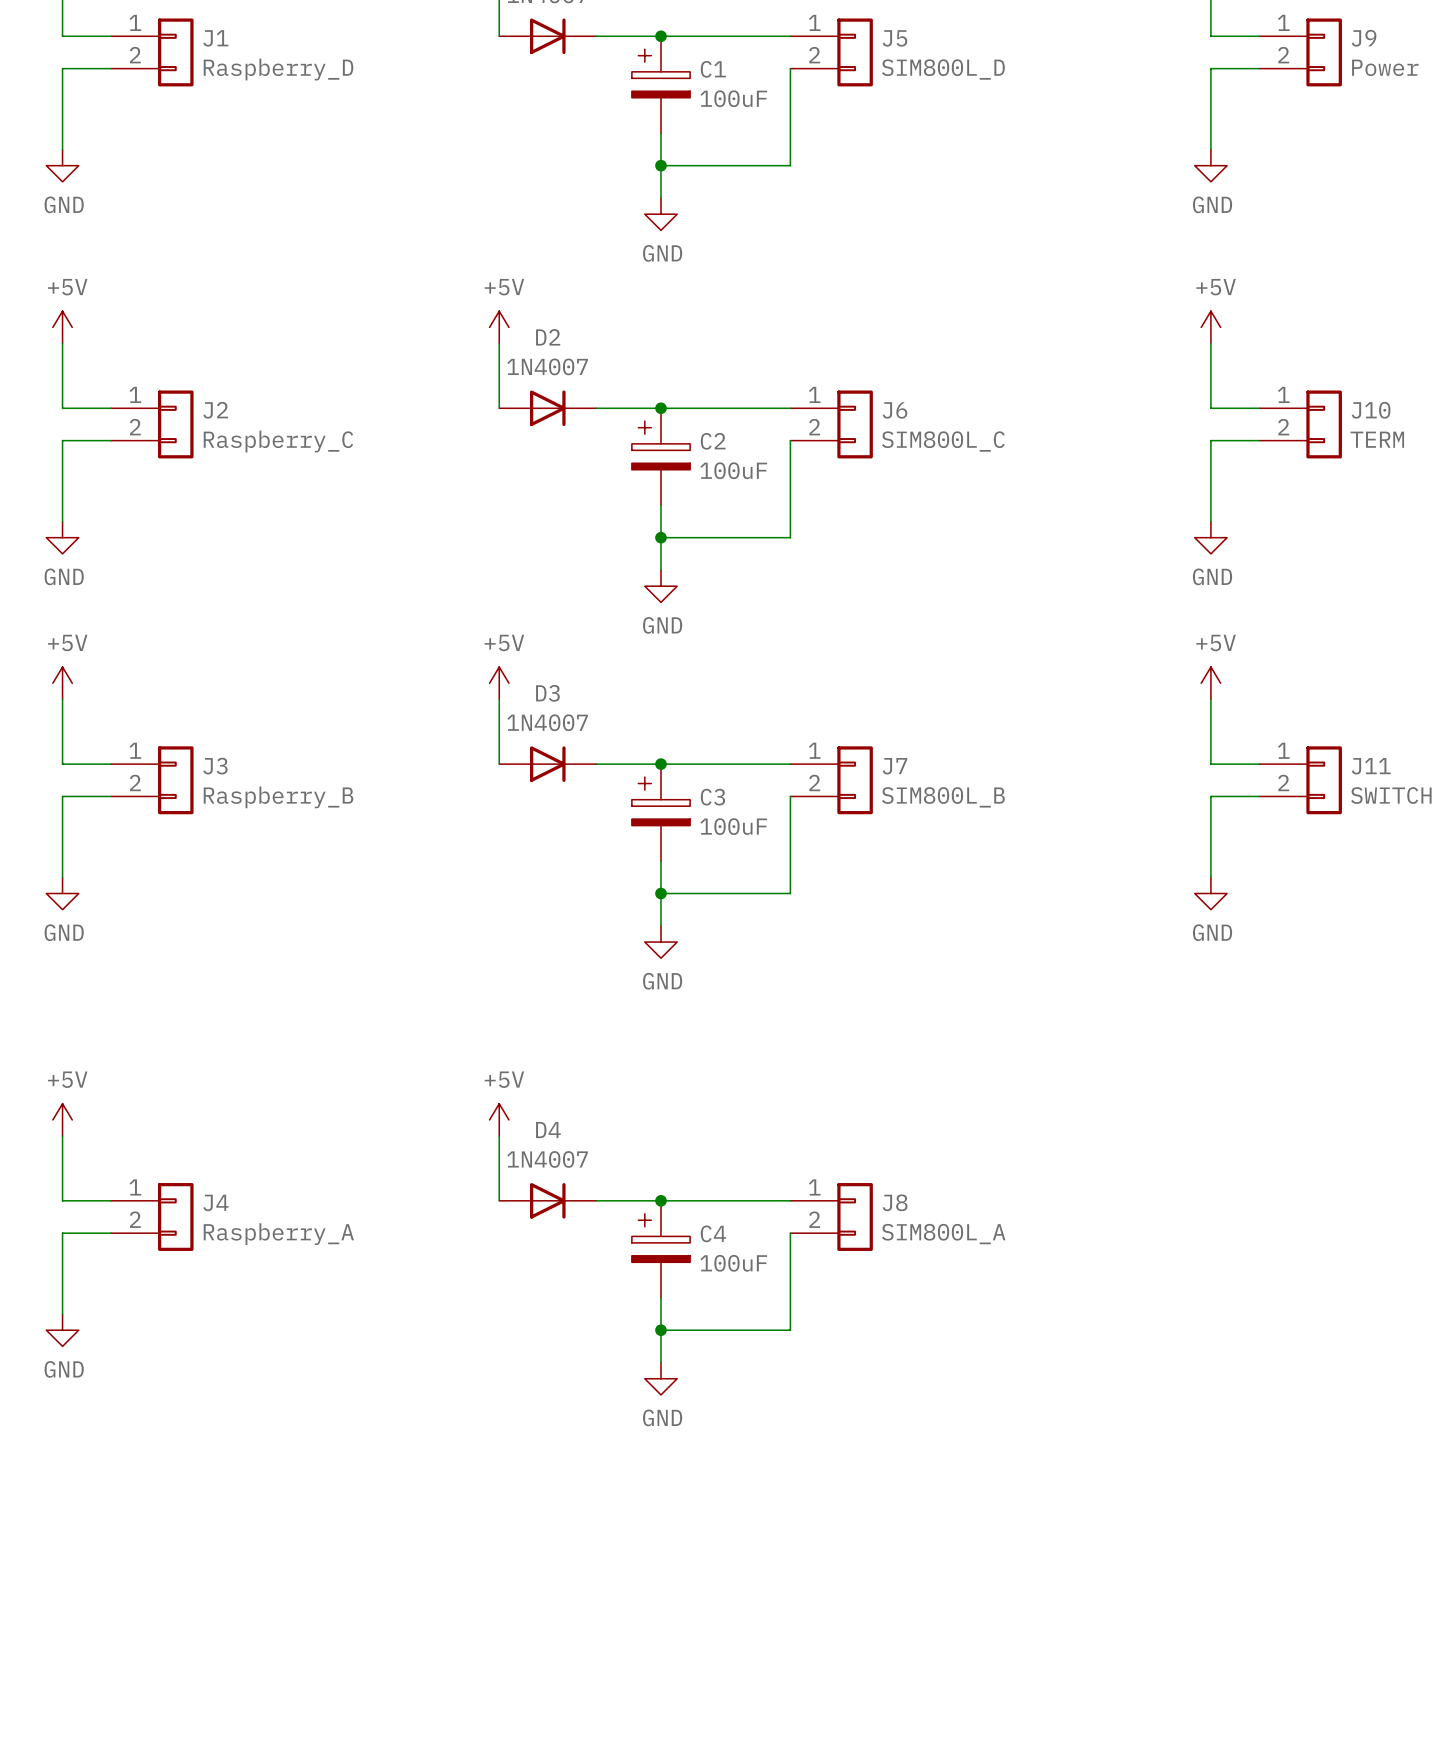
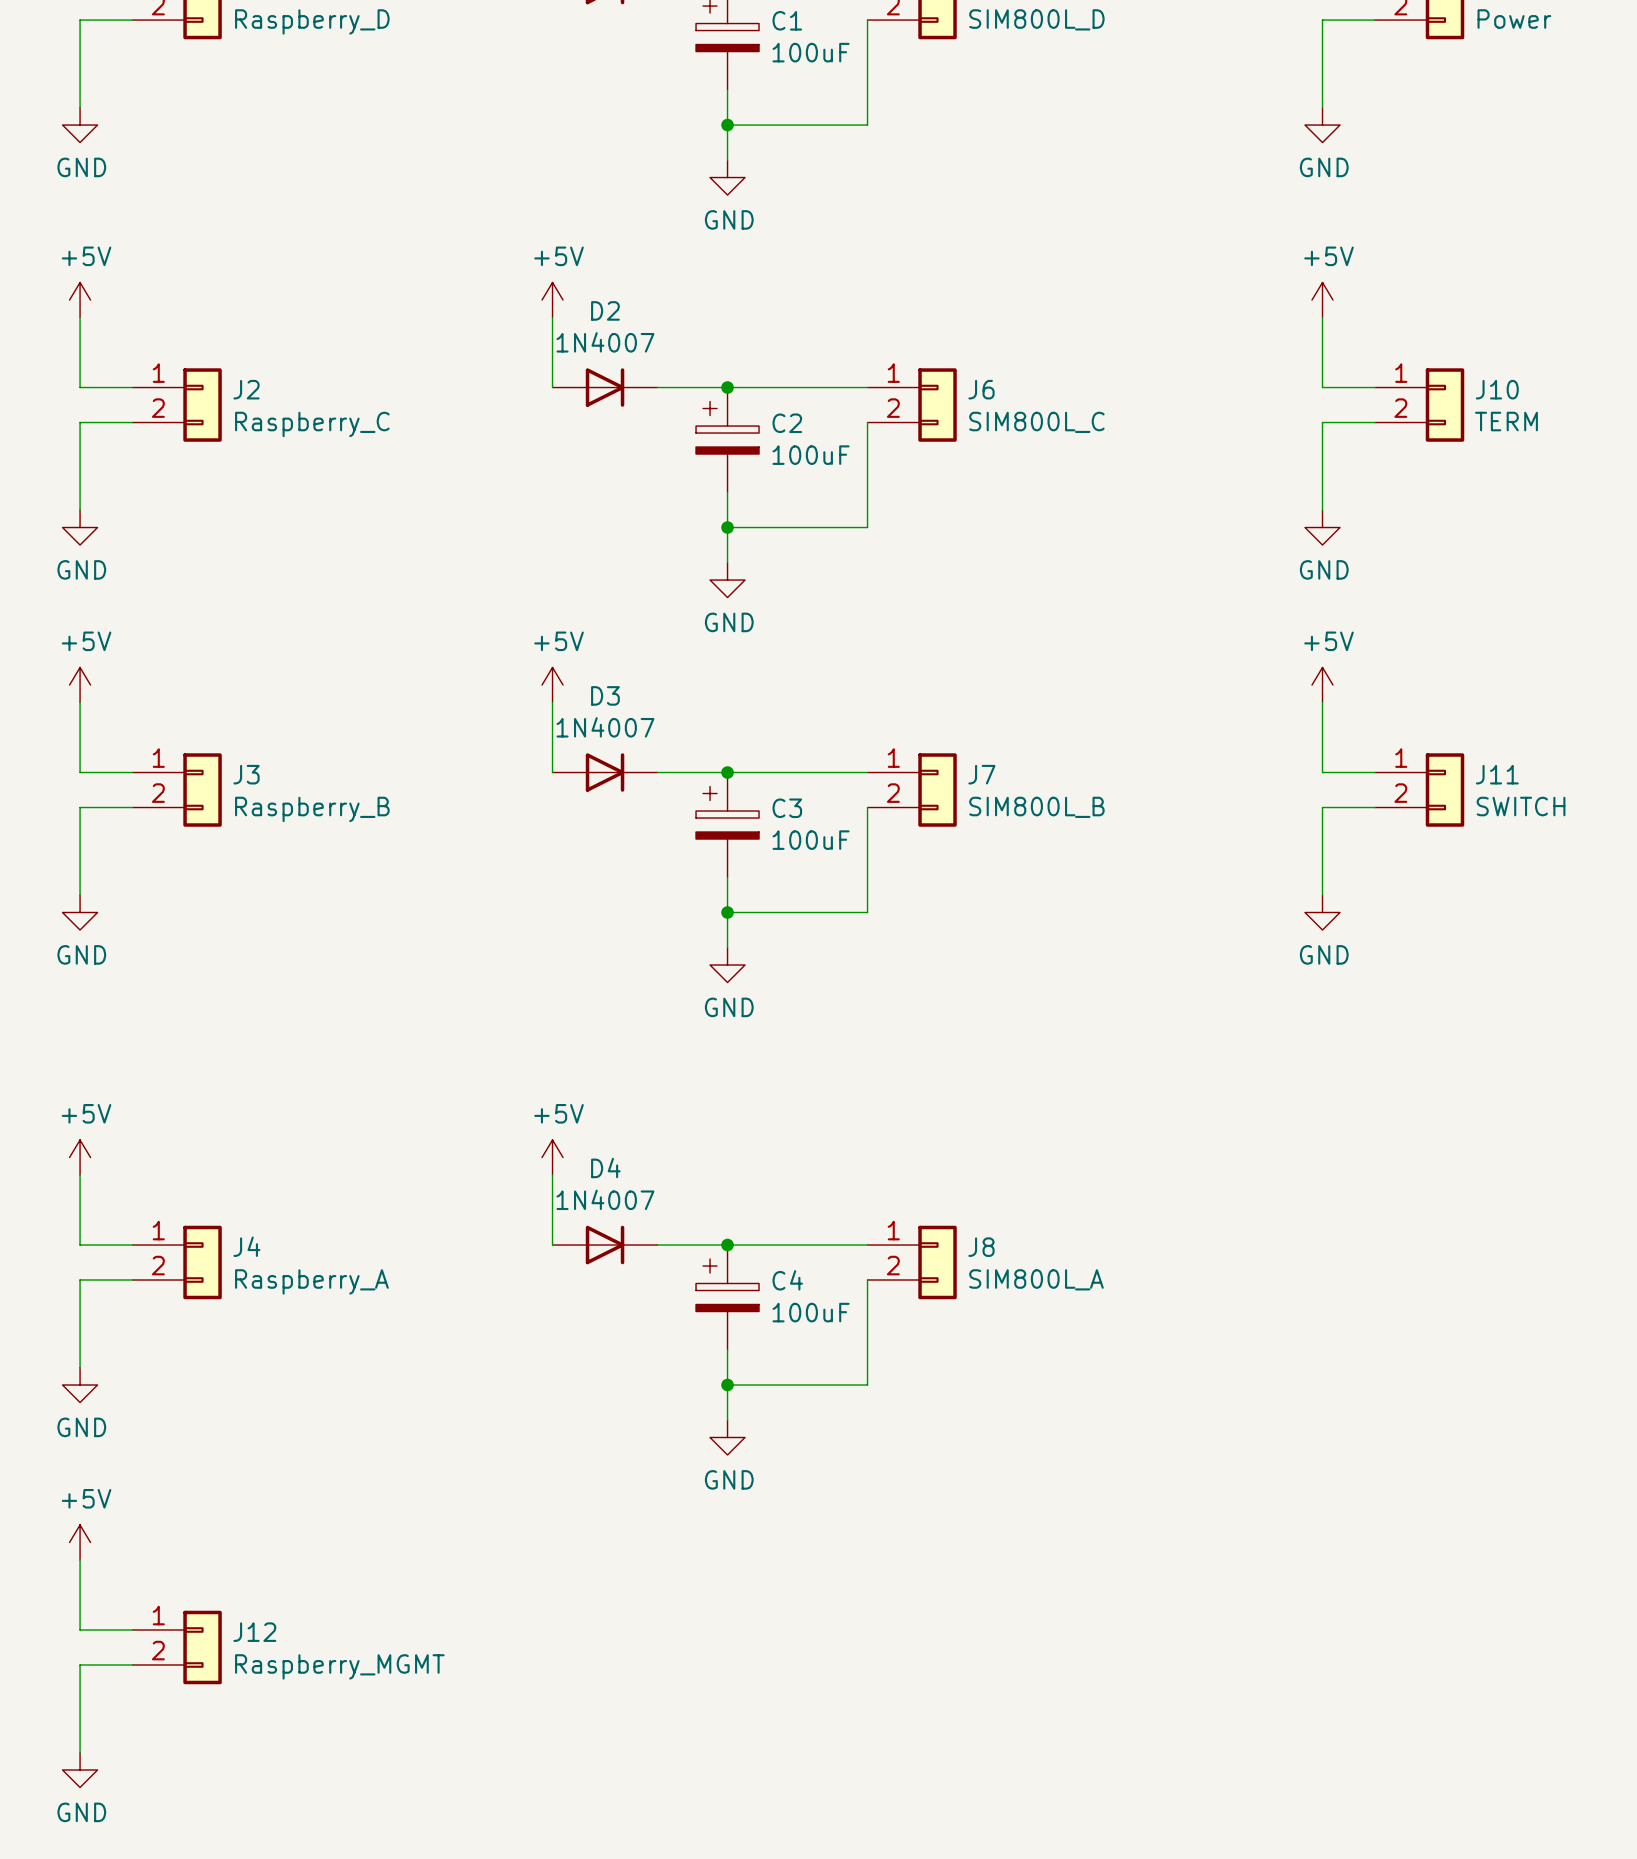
power symbol: none -> +5V (80, 1542)
wire: none -> (80, 1559) (80, 1629) (132, 1629)
J12: none -> Raspberry_MGMT (177, 1647)
wire: none -> (132, 1664) (80, 1664) (80, 1752)
power symbol: none -> GND (80, 1769)

